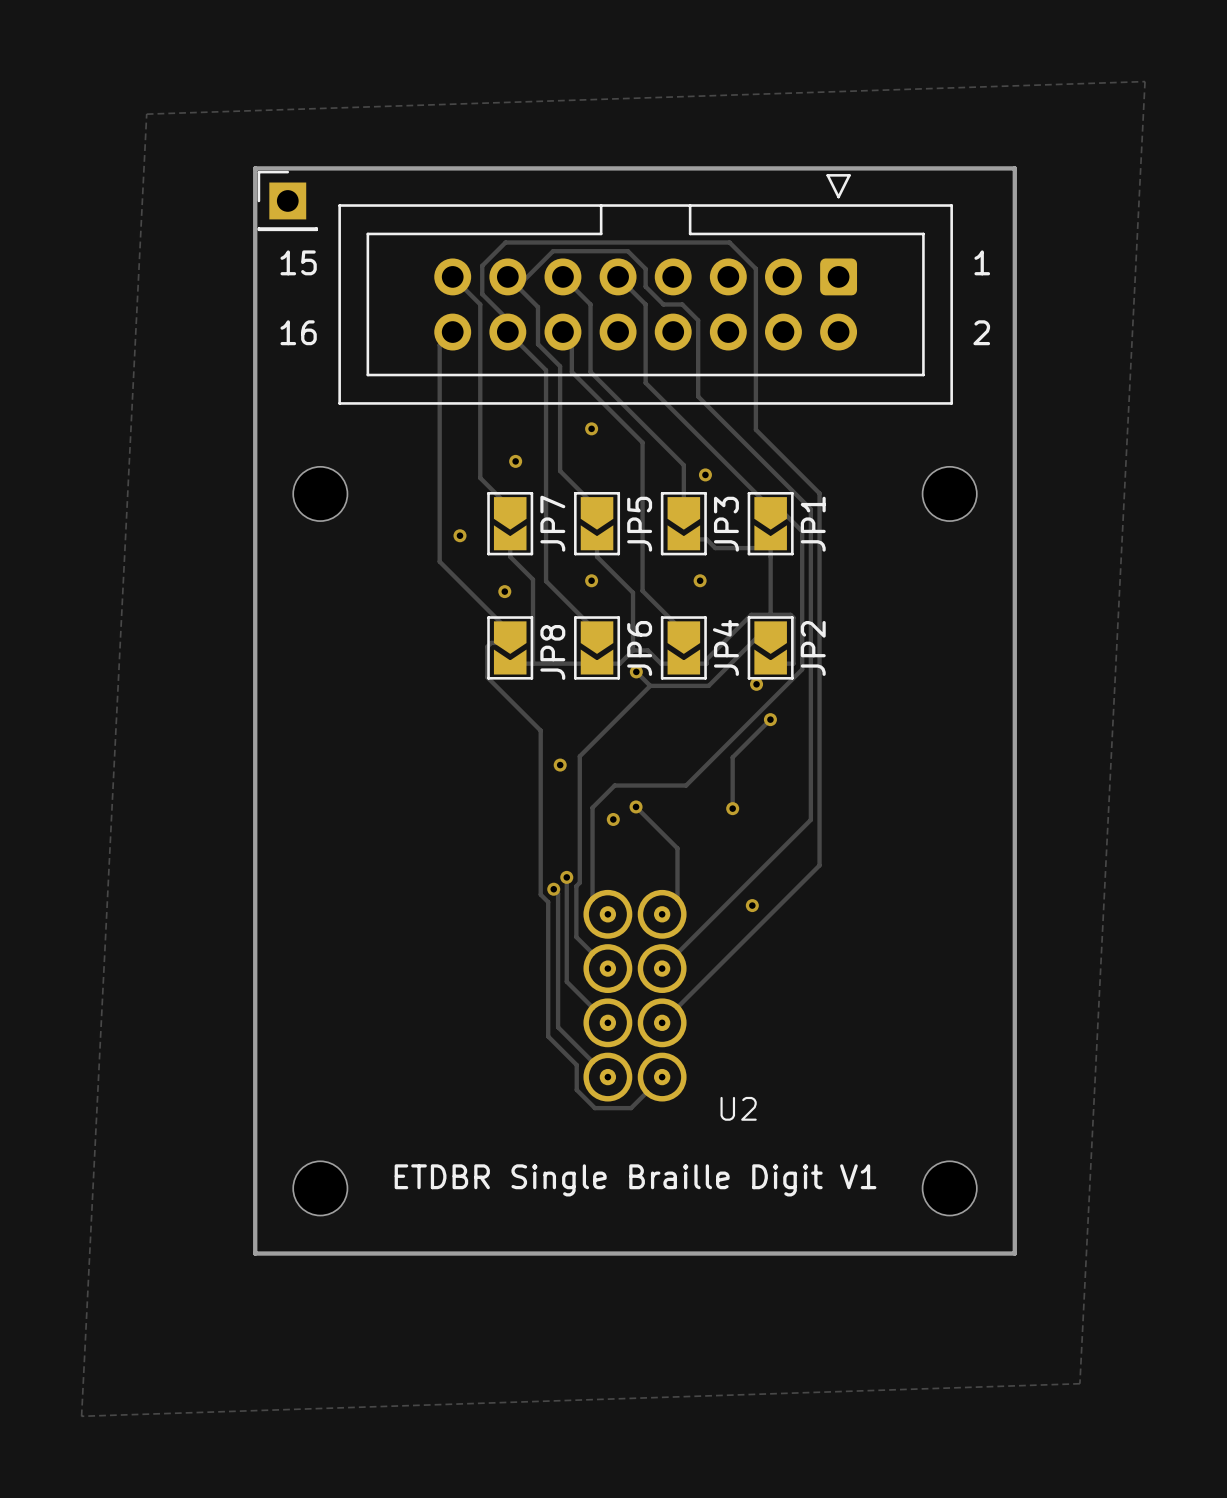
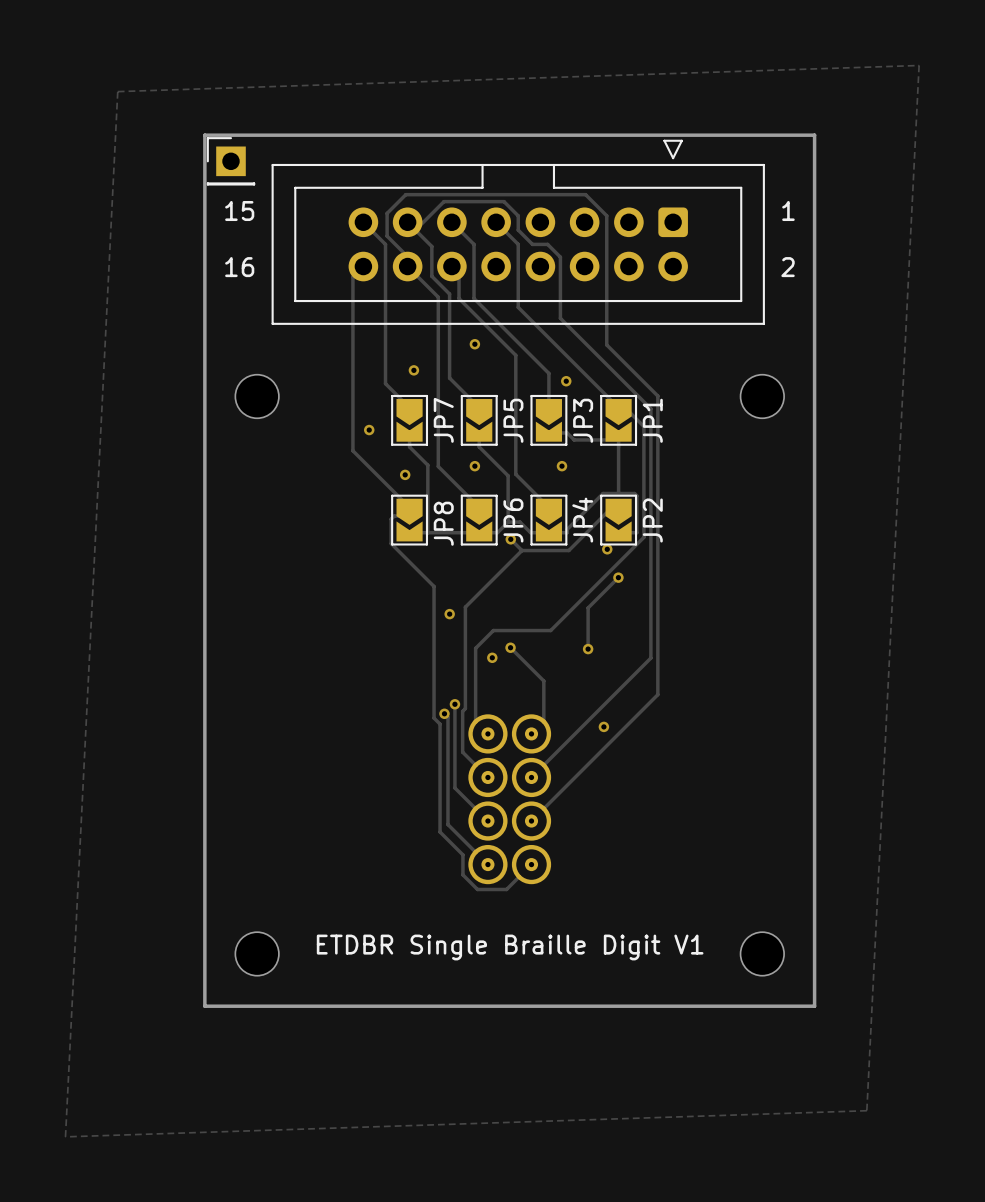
U2 name: U2 (738, 1108) -> none

